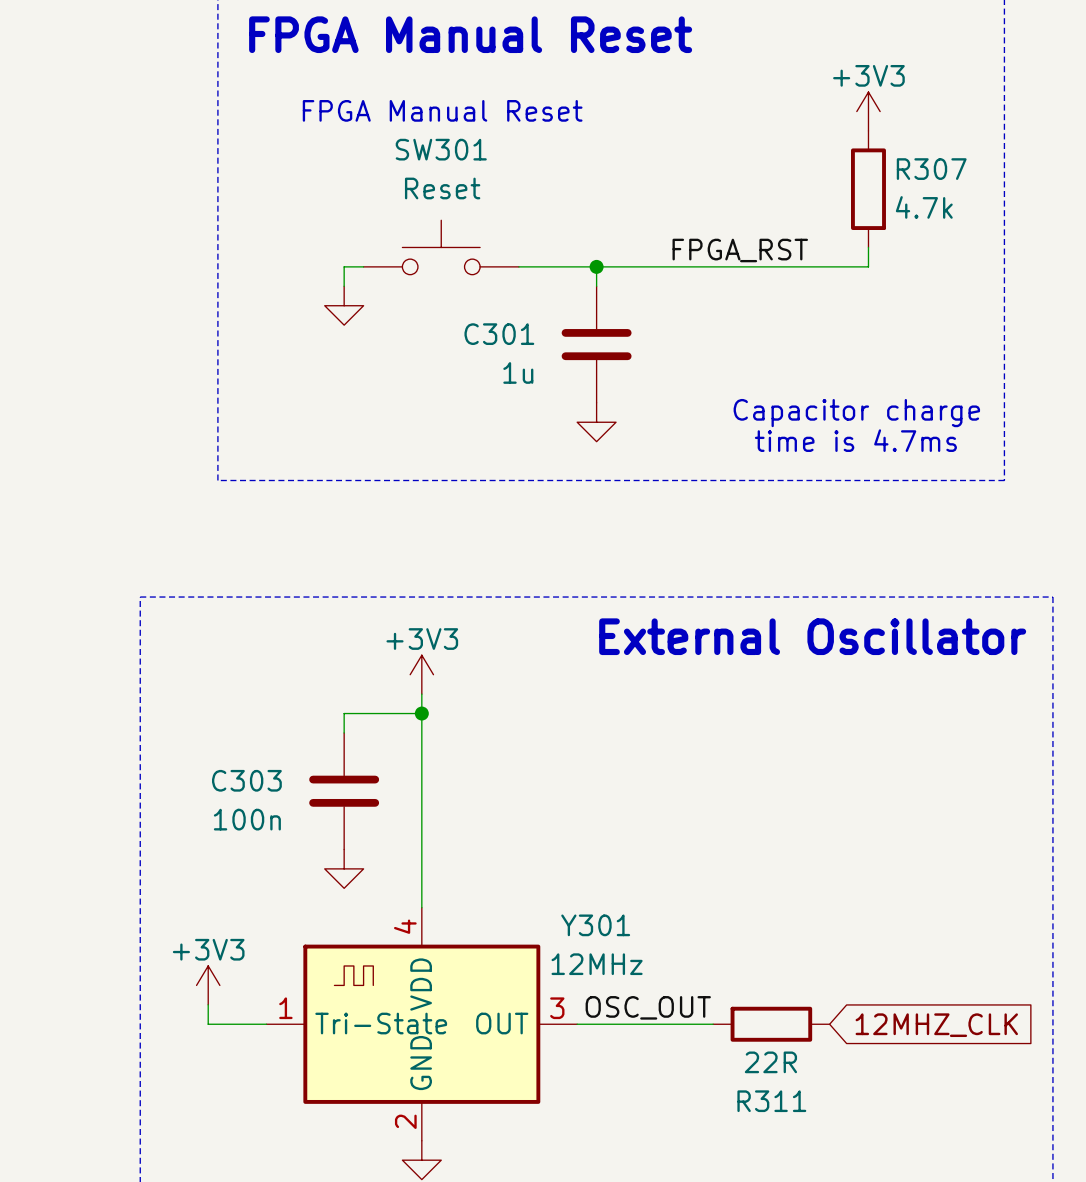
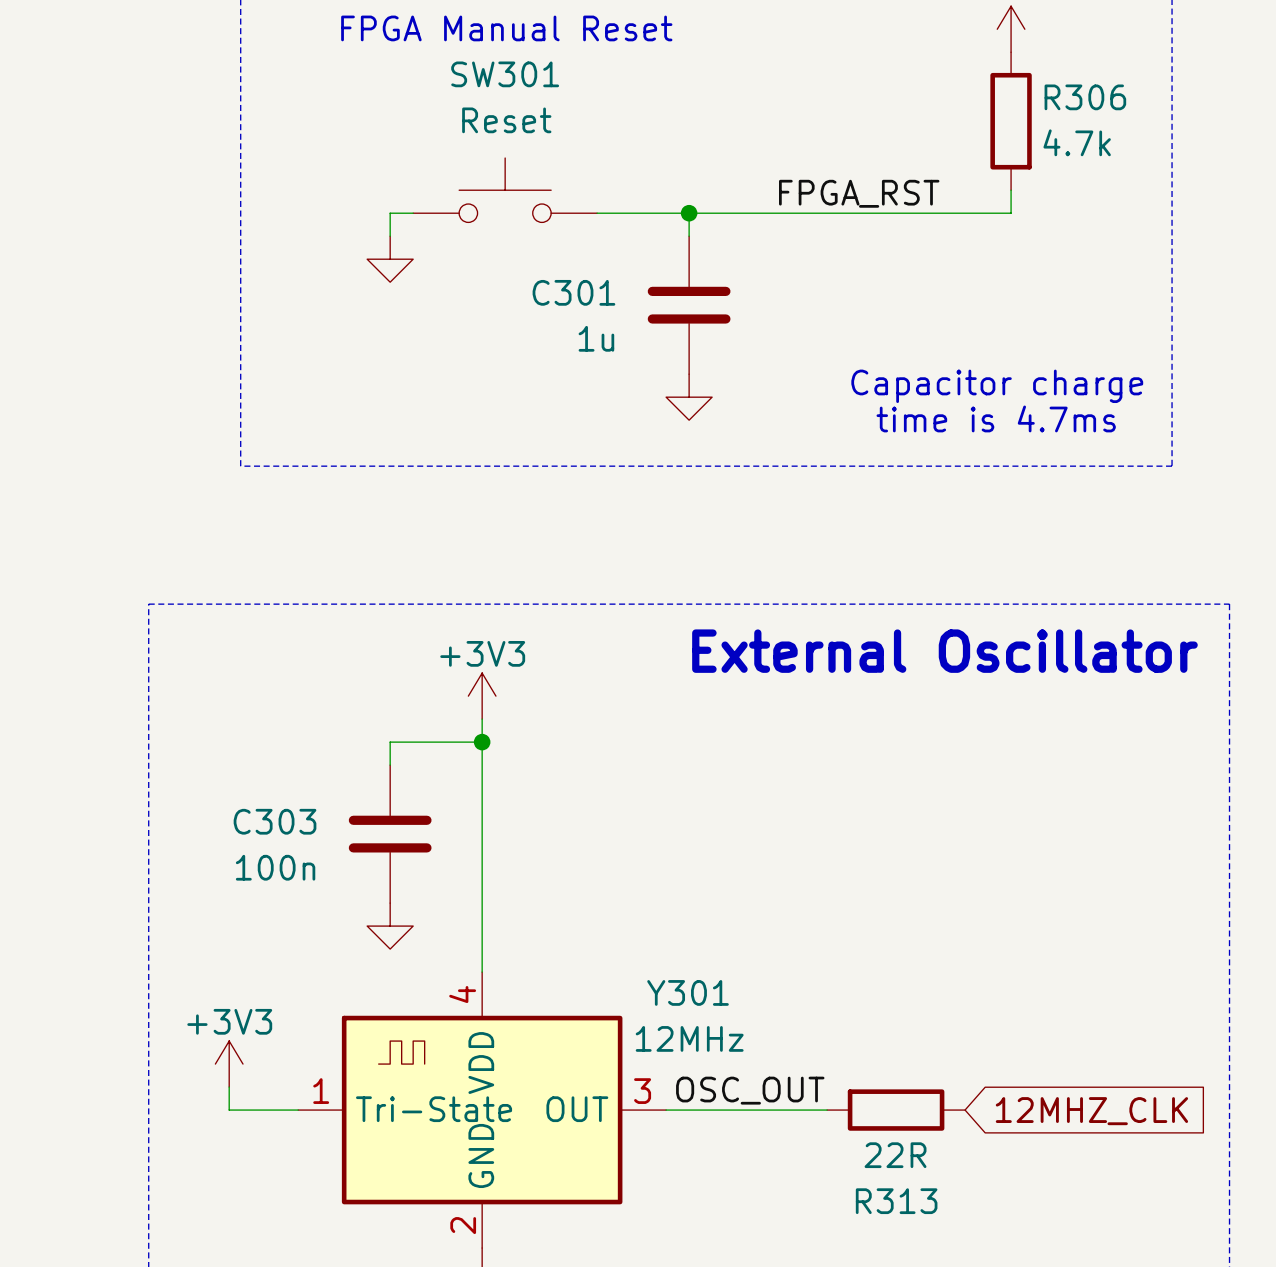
R307 name: R307 (931, 169) -> R306 (1085, 97)
R311 name: R311 (771, 1101) -> R313 (896, 1201)

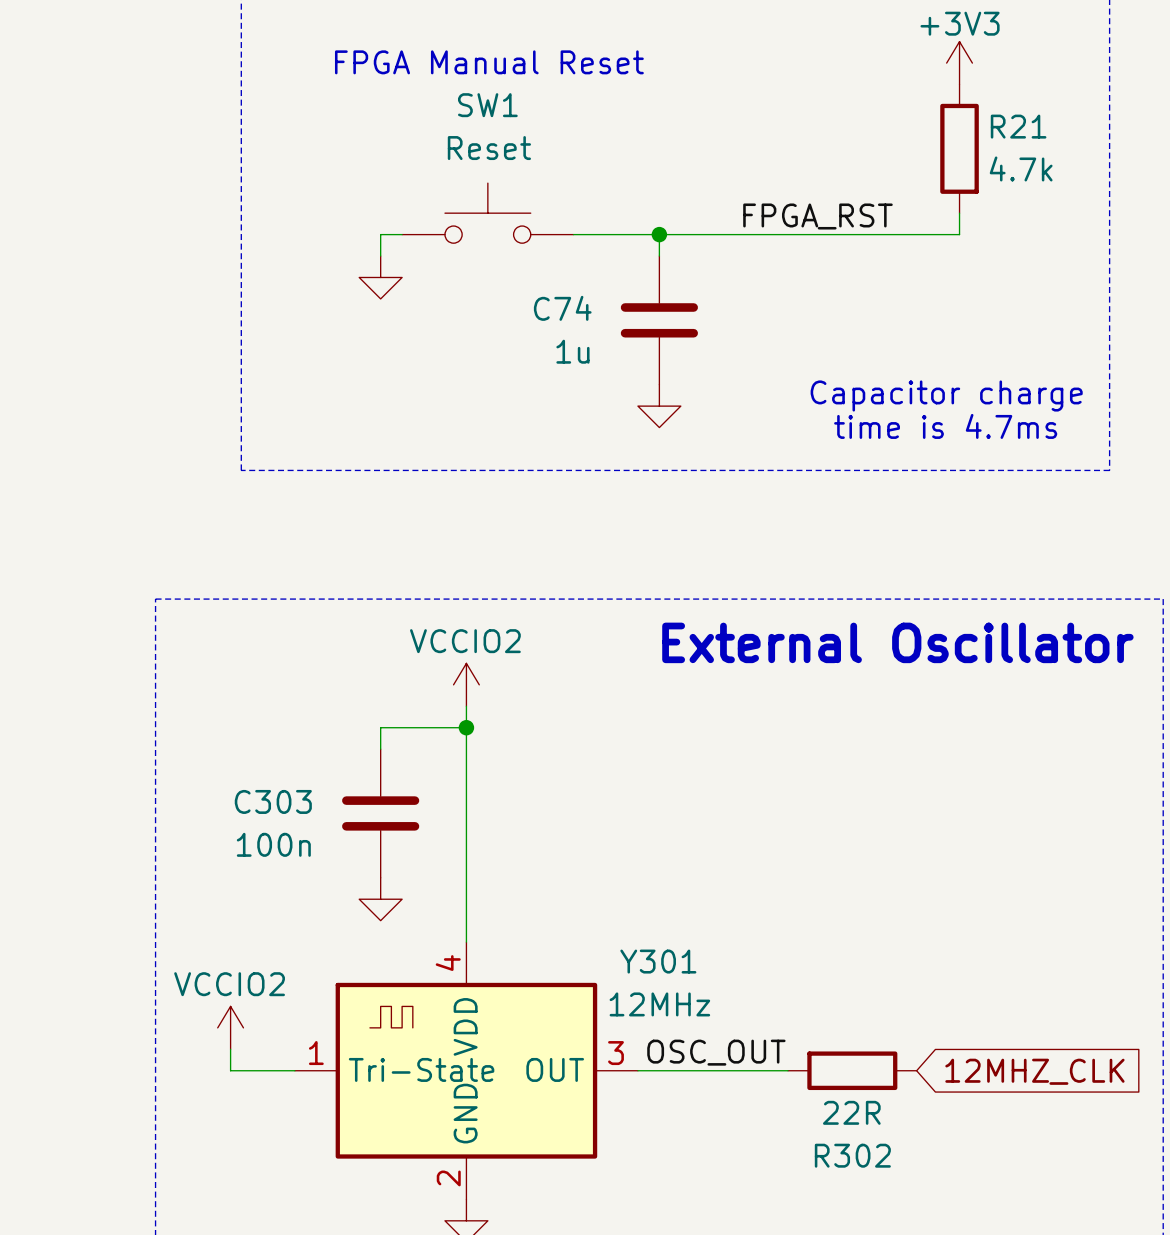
SW301 name: SW301 (505, 74) -> SW1 (487, 105)
R306 name: R306 (1085, 97) -> R21 (1018, 126)
C301 name: C301 (573, 292) -> C74 (562, 308)
power symbol: +3V3 (482, 696) -> VCCIO2 (466, 684)
power symbol: +3V3 (229, 1064) -> VCCIO2 (230, 1027)
R313 name: R313 (896, 1201) -> R302 (852, 1155)

